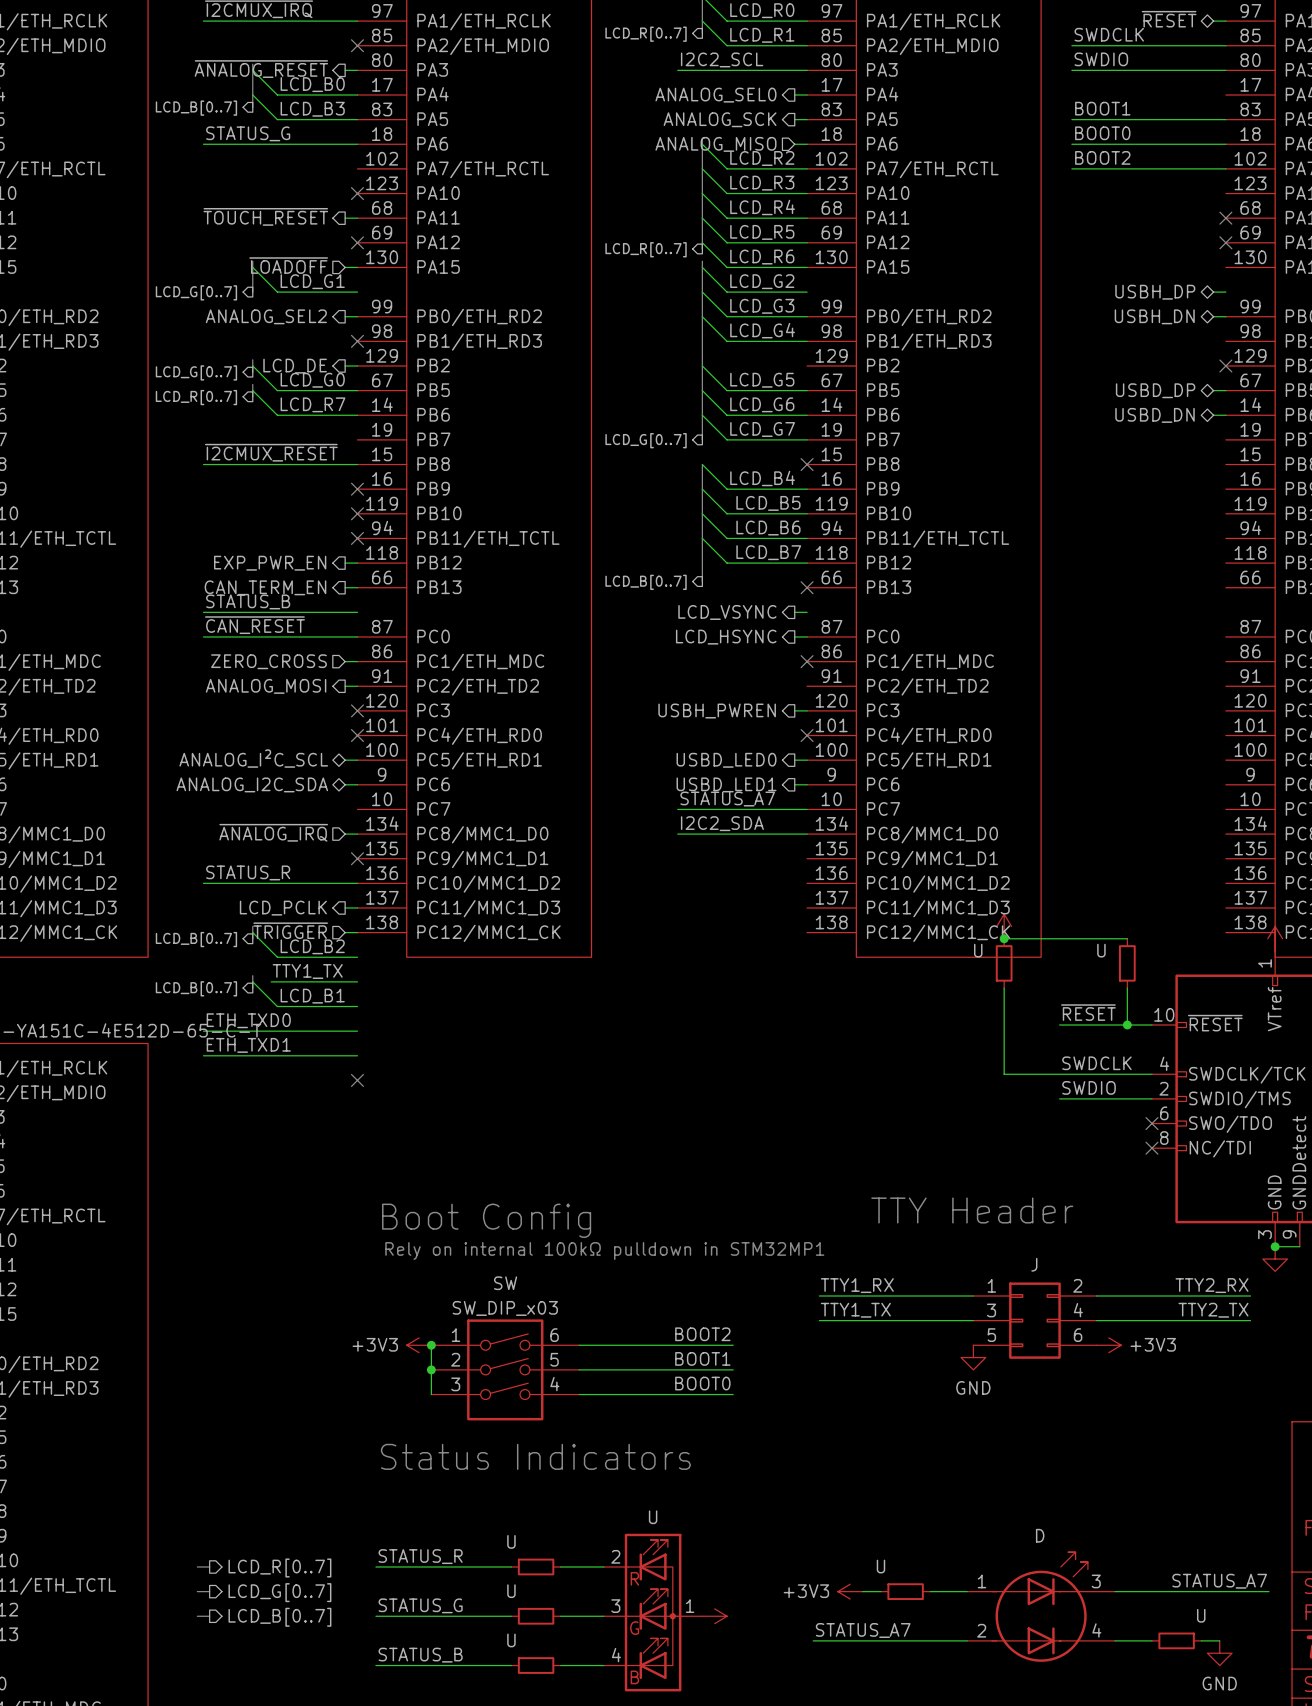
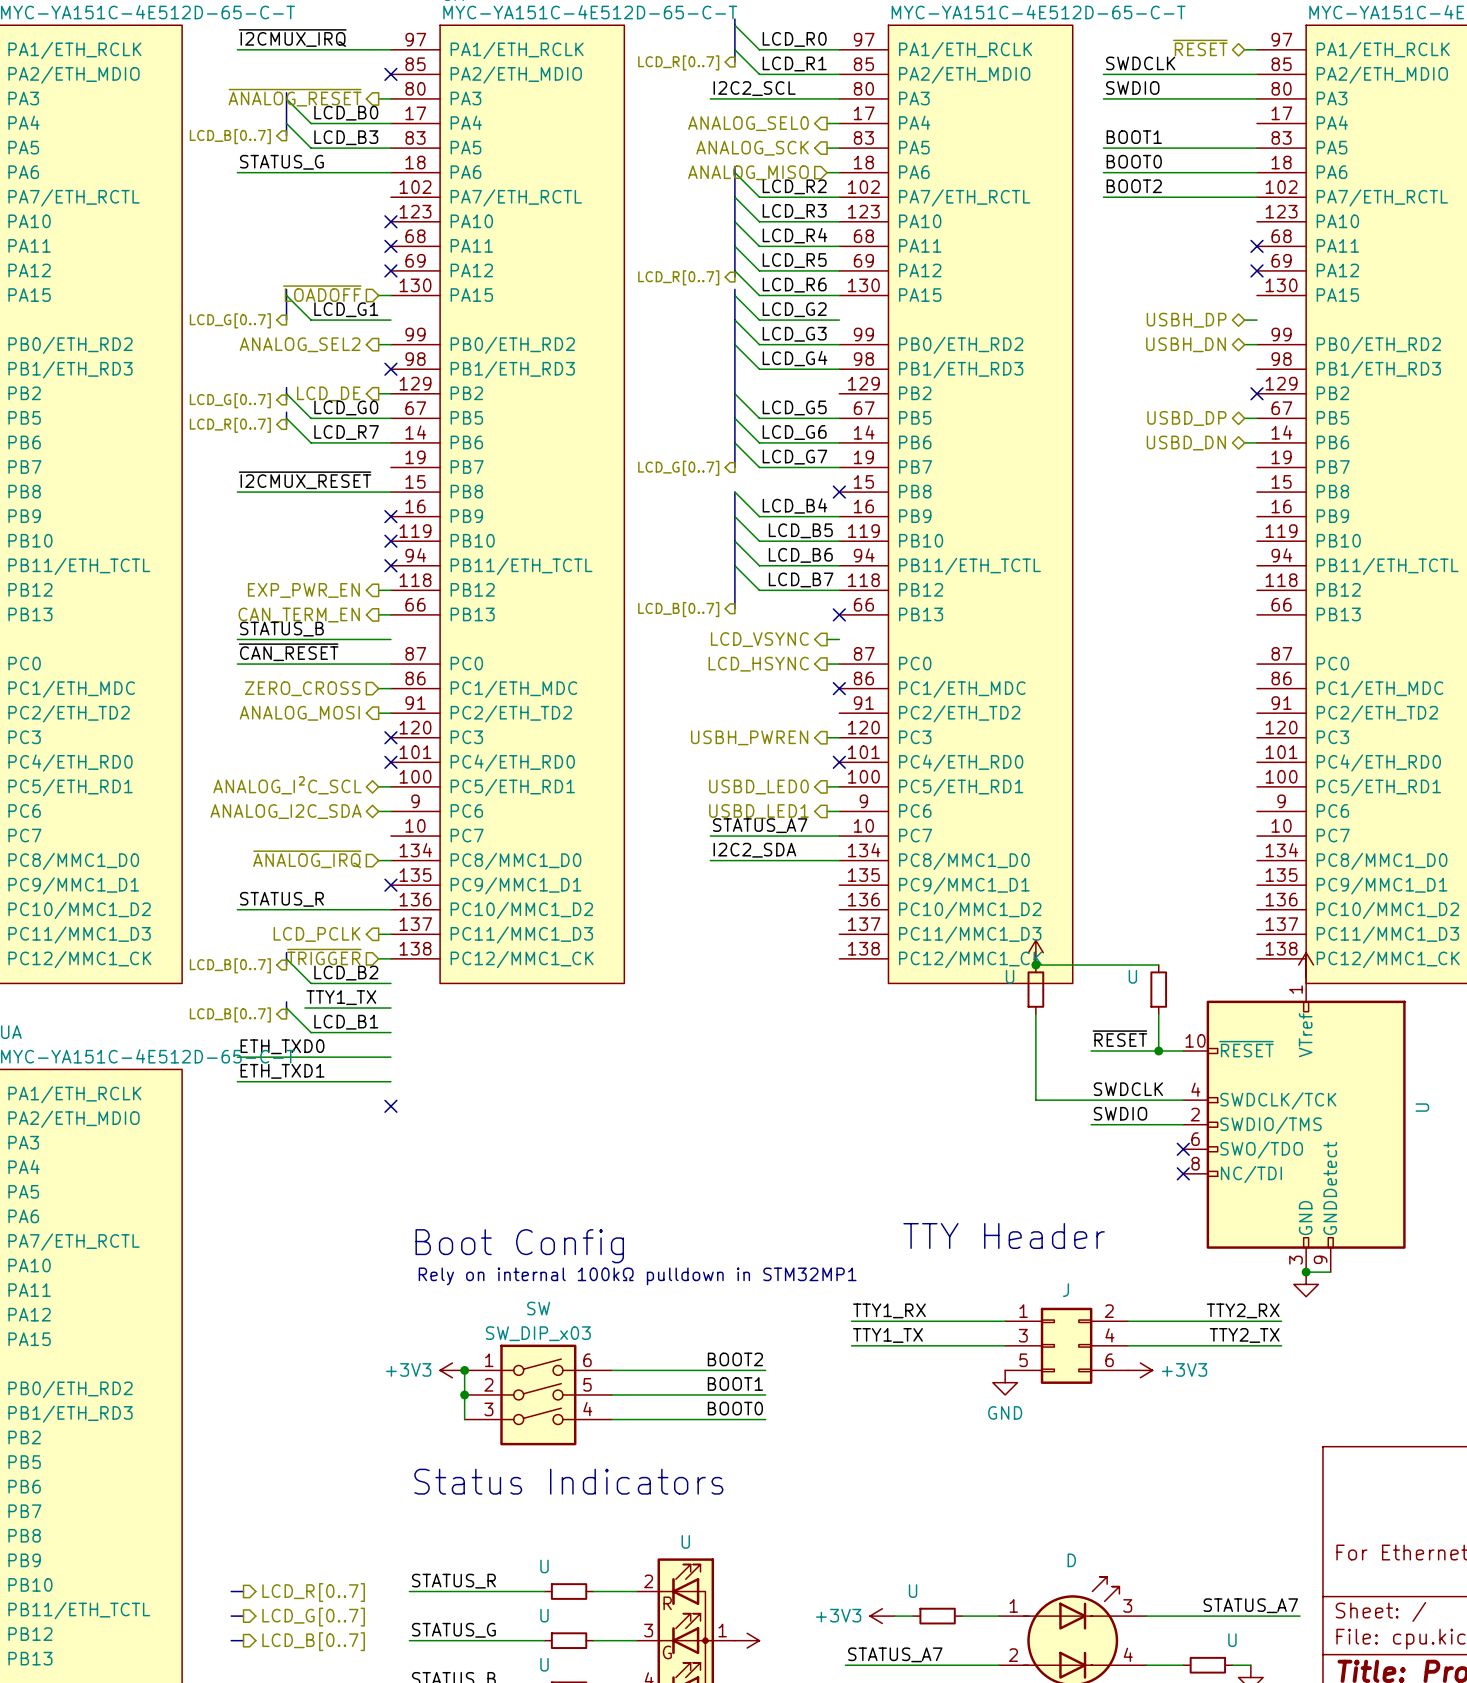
hierarchical label: ~{TOUCH_RESET} (265, 216) -> none
wire: (345, 218) (357, 218) -> none
no-connect mark: none -> (390, 246)

